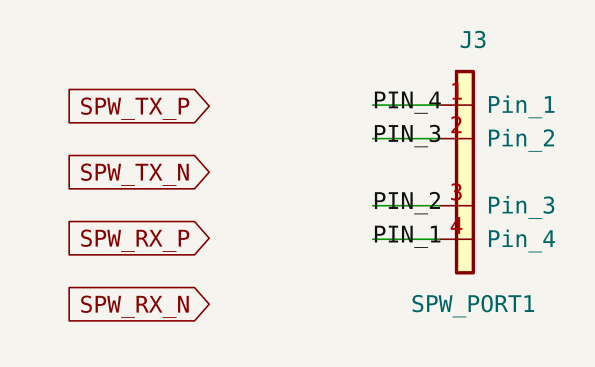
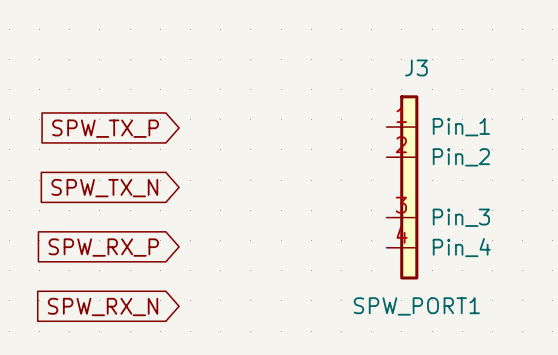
label: PIN_4 (407, 102) -> none
wire: (372, 105) (439, 105) -> none
label: PIN_3 (407, 136) -> none
wire: (372, 138) (439, 138) -> none
label: PIN_2 (407, 203) -> none
wire: (372, 205) (439, 205) -> none
label: PIN_1 (407, 236) -> none
wire: (372, 239) (439, 239) -> none

